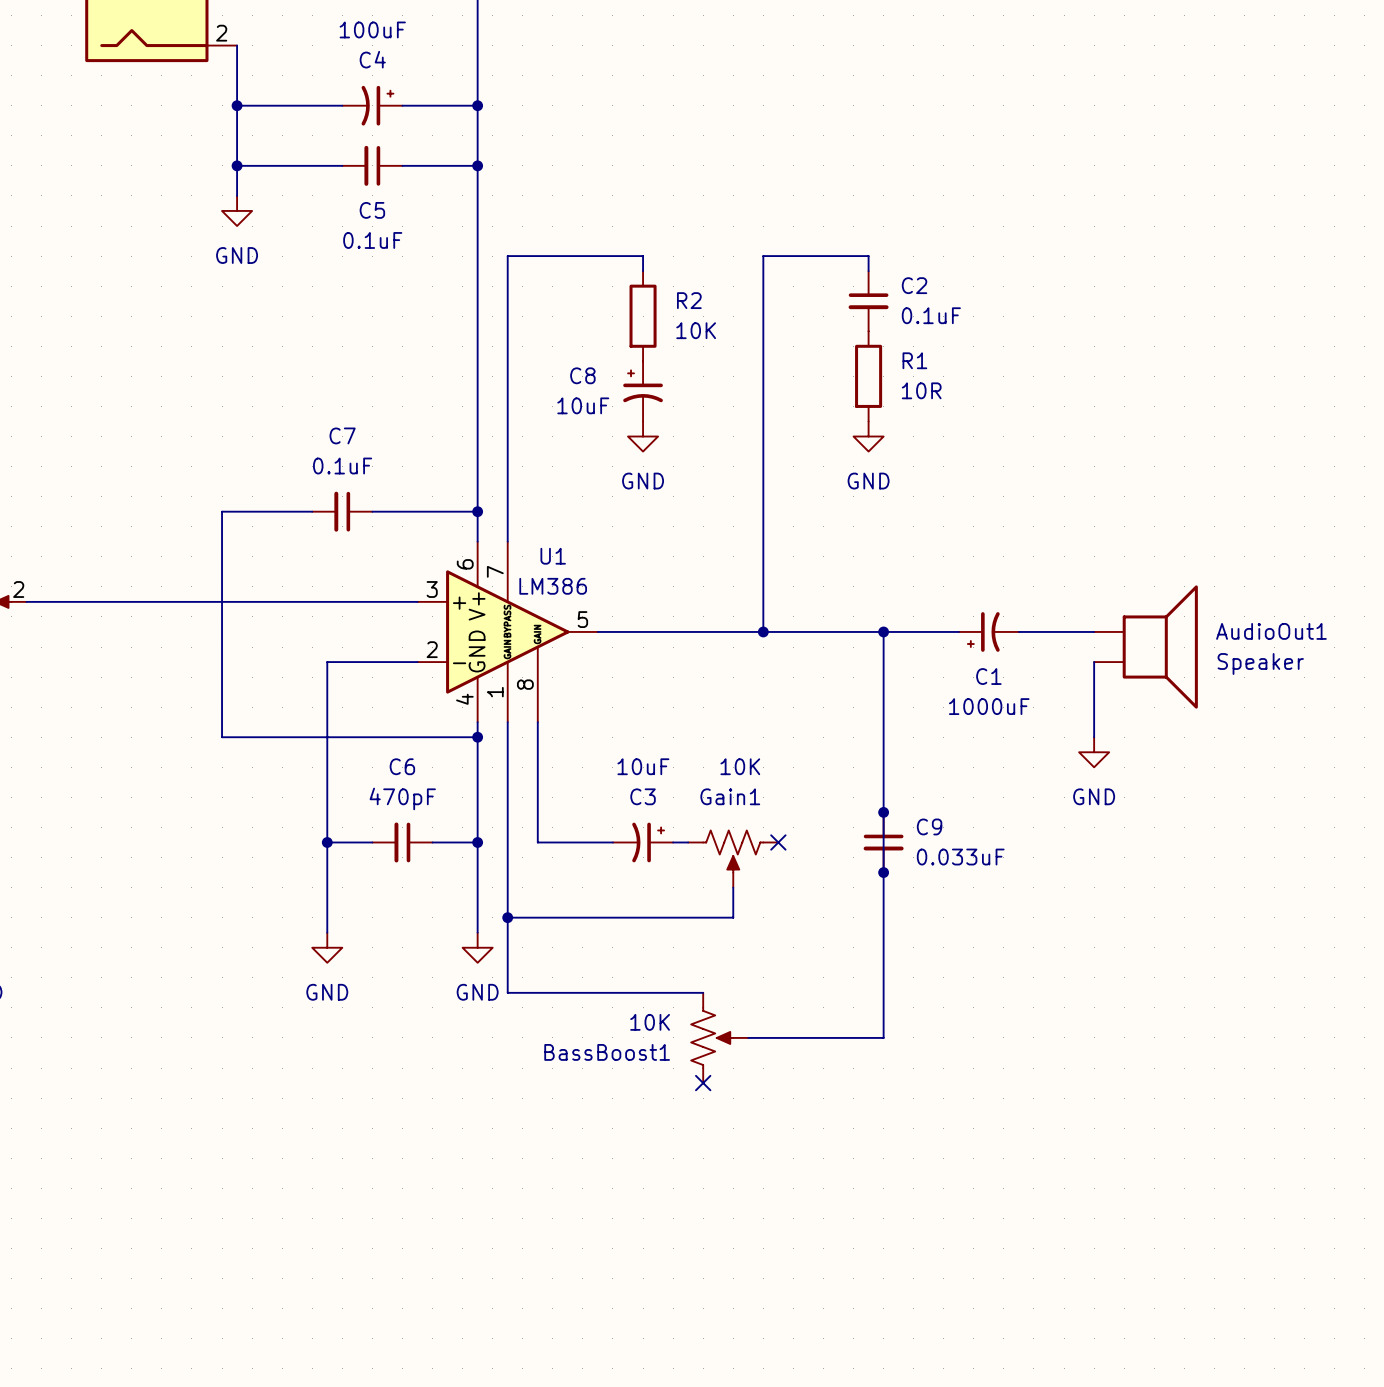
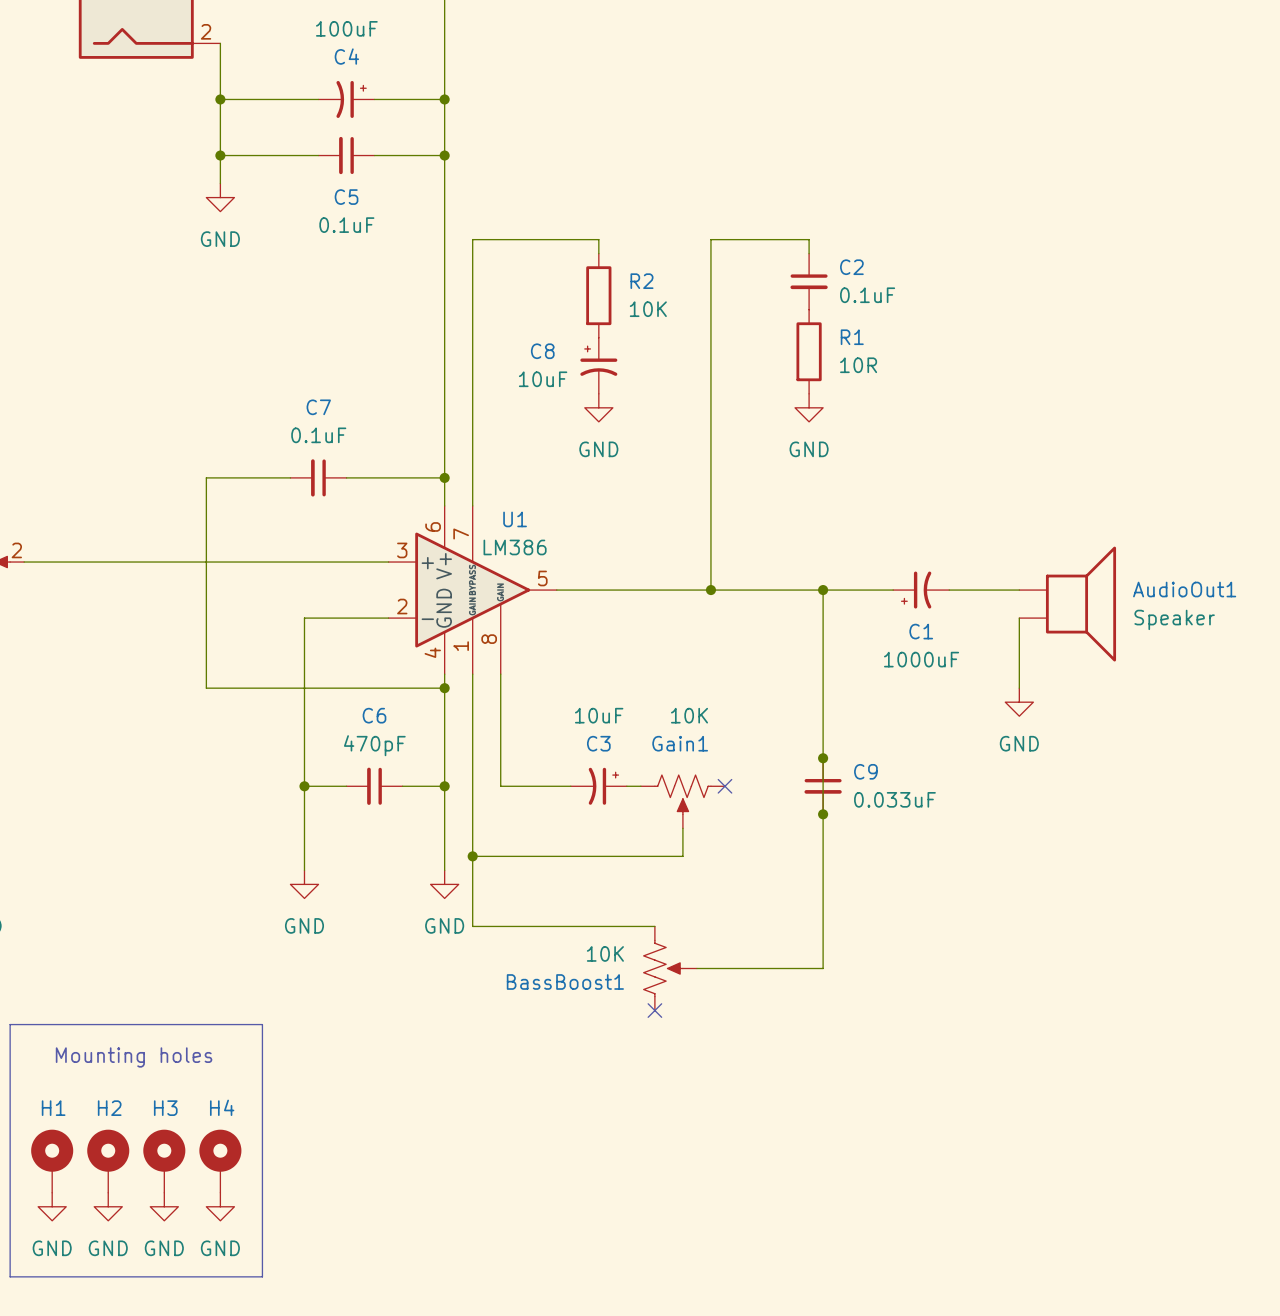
line: none -> (10, 1024) (262, 1024) (262, 1276) (10, 1276) (10, 1024)
text: none -> Mounting holes (134, 1057)
H1: none -> (52, 1161)
H2: none -> (108, 1161)
H3: none -> (164, 1161)
H4: none -> (220, 1161)
power symbol: none -> GND (52, 1206)
power symbol: none -> GND (108, 1206)
power symbol: none -> GND (164, 1206)
power symbol: none -> GND (220, 1206)

